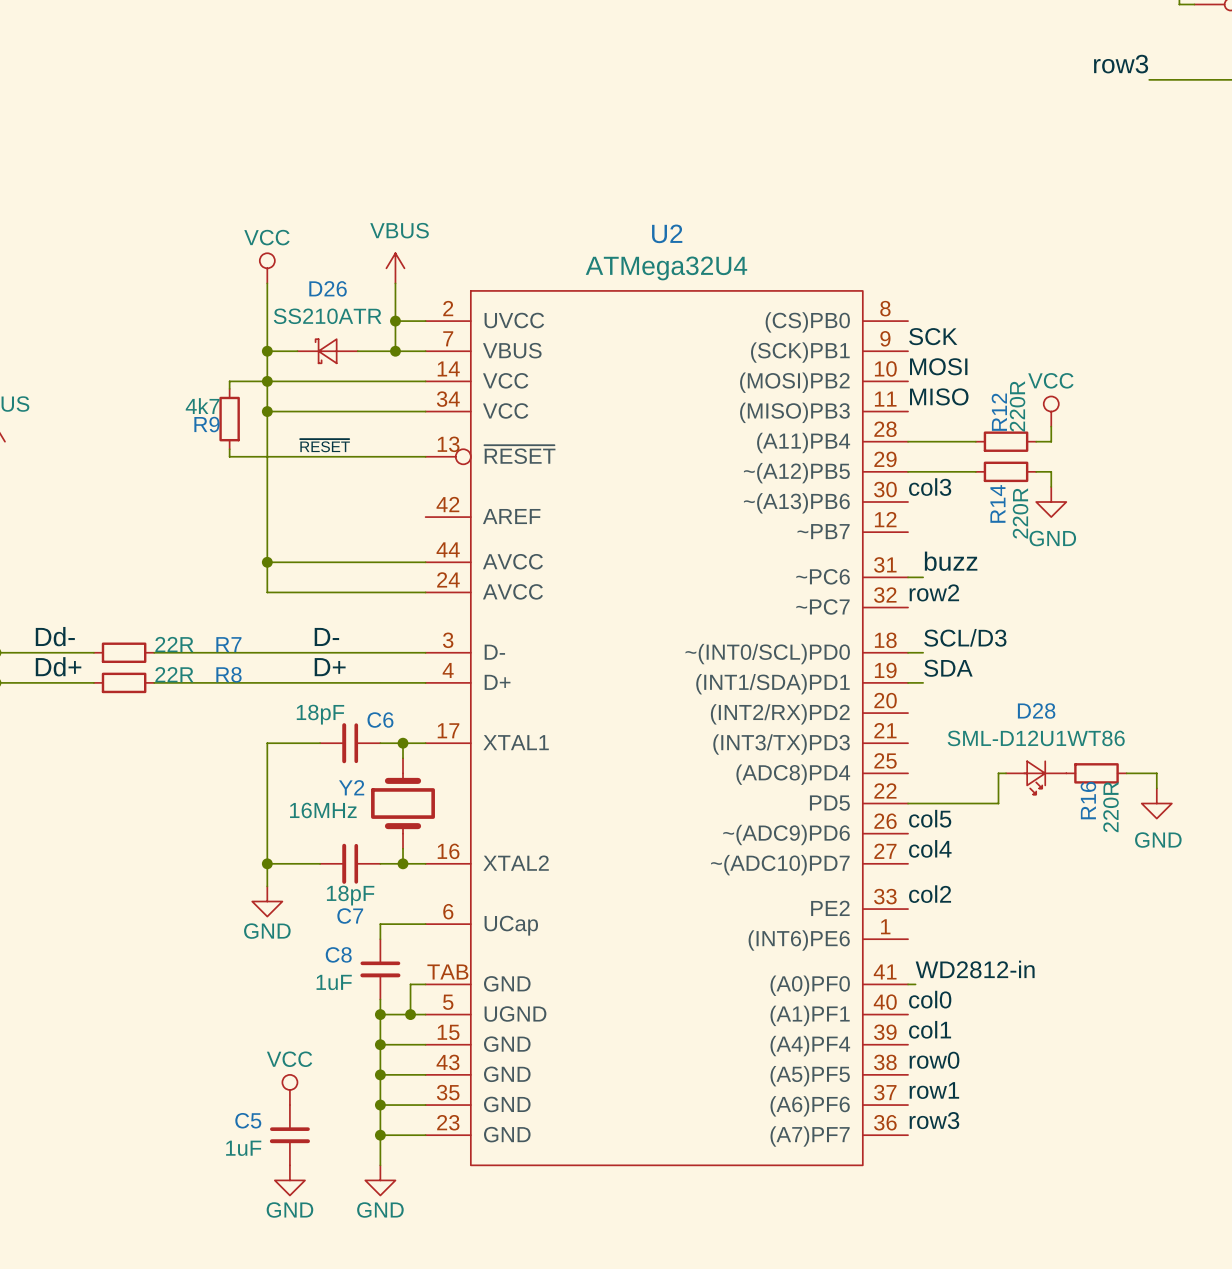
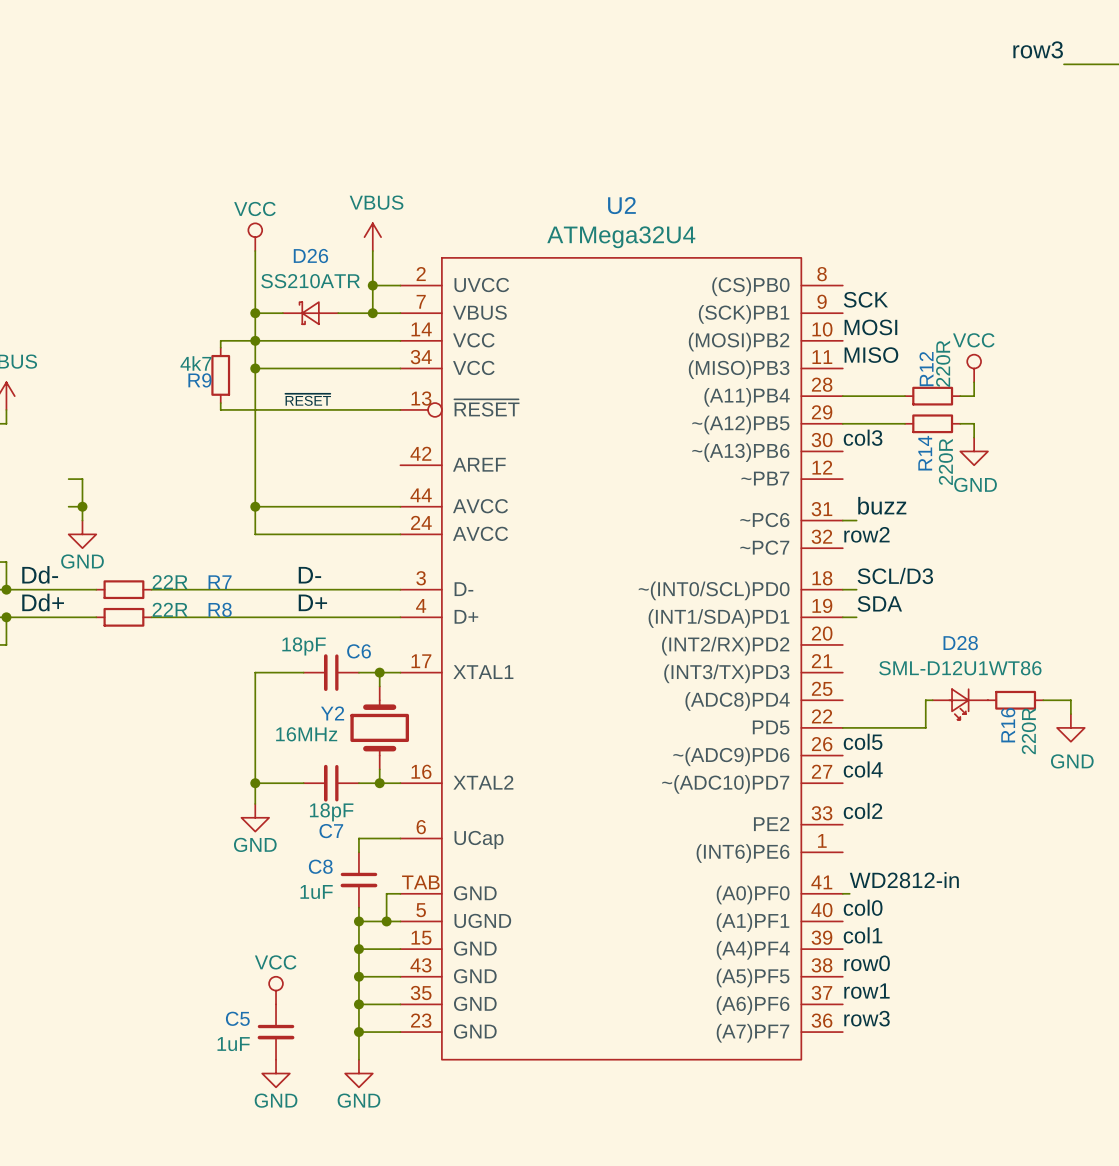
wire: none -> (68, 479) (82, 479) (82, 520)
wire: none -> (68, 506) (82, 506)
junction: none -> (82, 506)
power symbol: none -> GND (82, 534)
label position: Dd- (55, 636) -> Dd- (40, 574)
label position: Dd+ (58, 666) -> Dd+ (43, 602)

